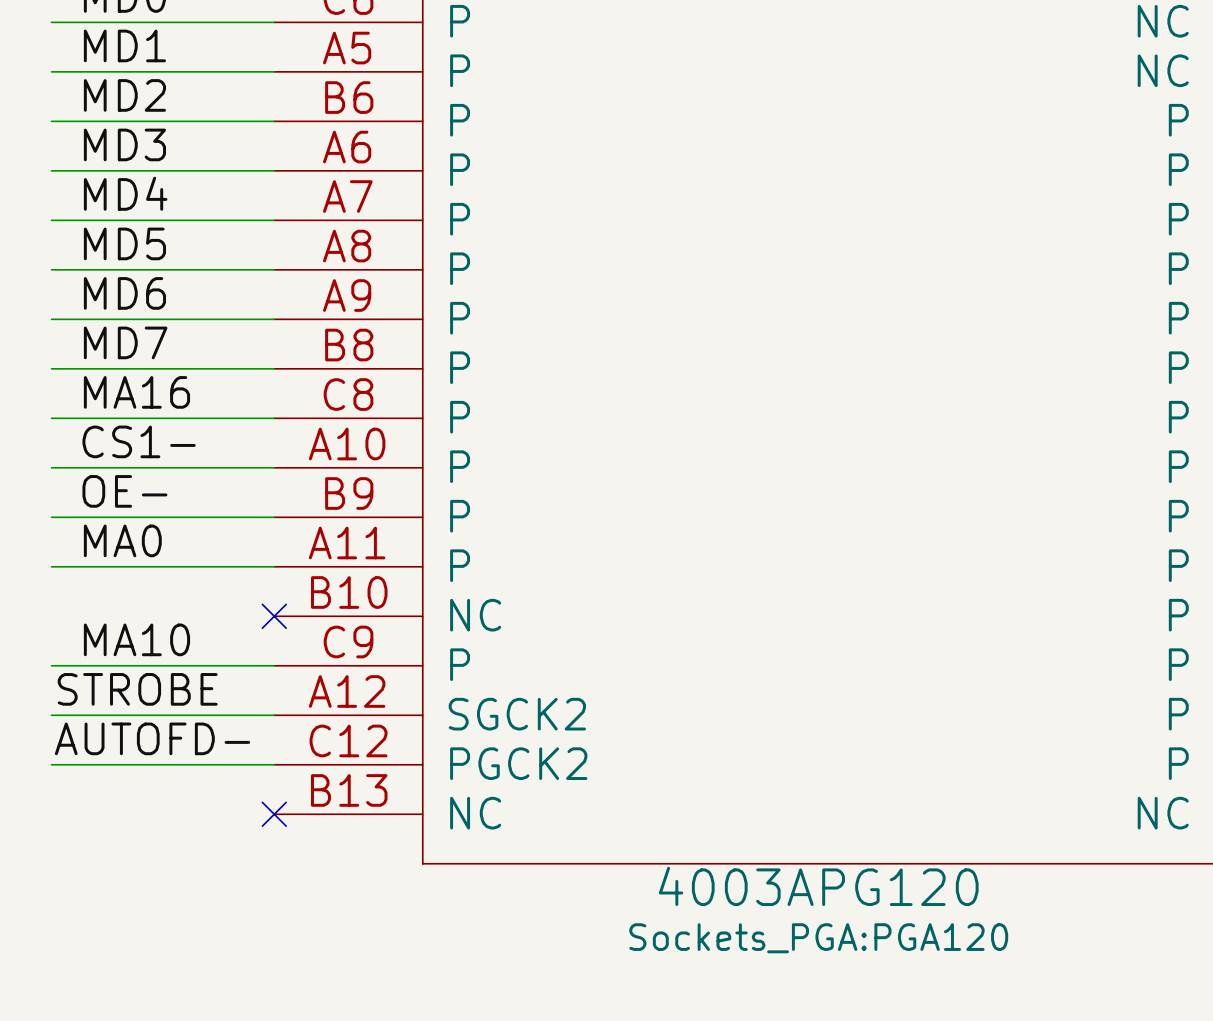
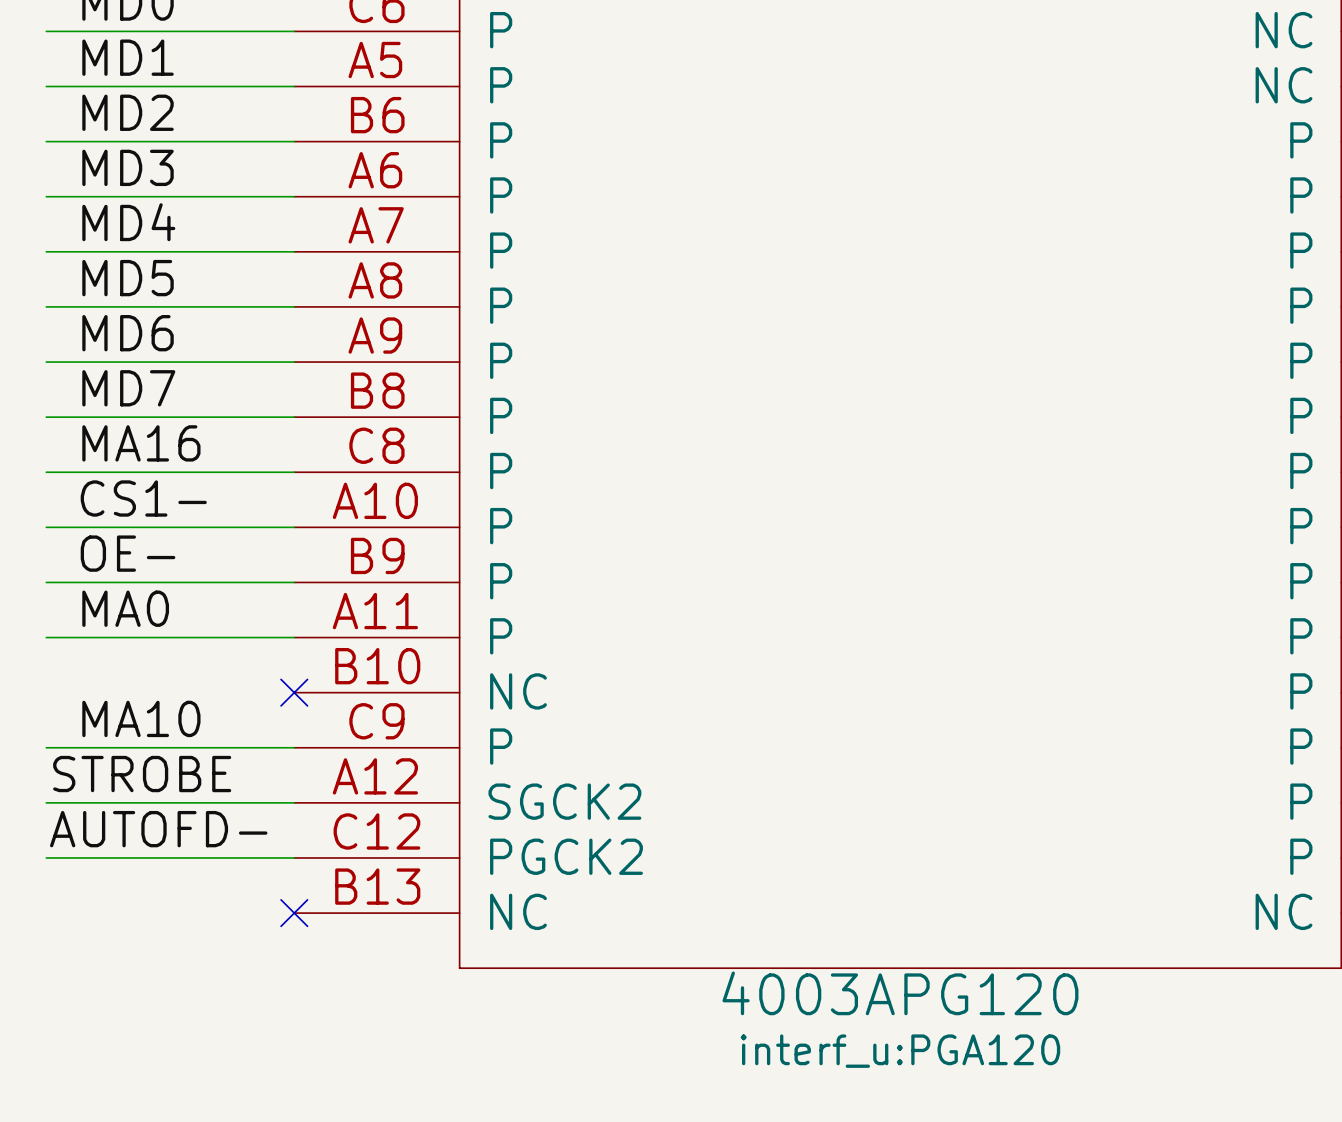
part text: Sockets_PGA:PGA120 (818, 938) -> interf_u:PGA120 (900, 1051)

